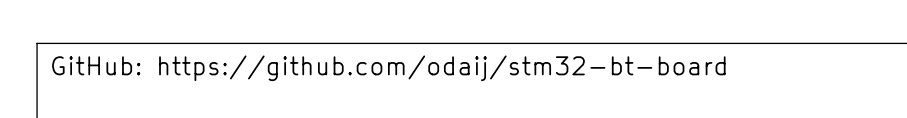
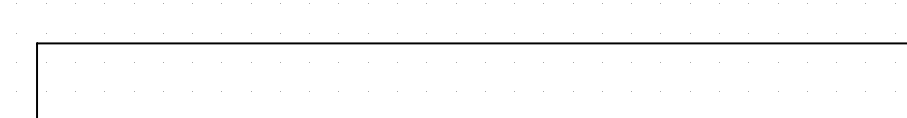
title block: GitHub: https://github.com/odaij/stm32-bt-board (388, 68) -> none

